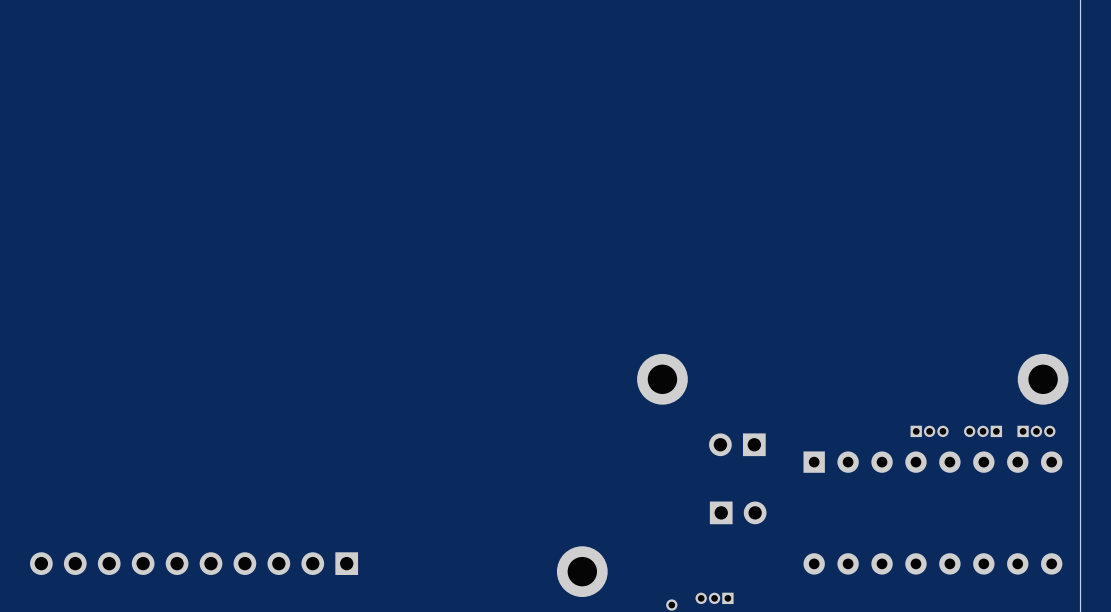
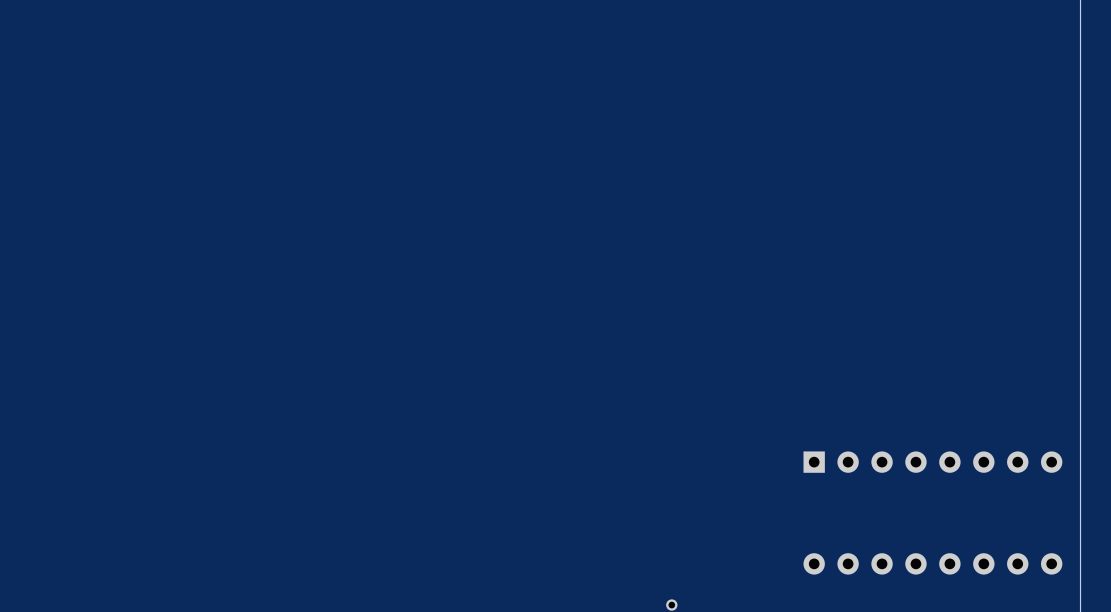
part: (662, 379) -> none
part: (1043, 379) -> none
part: (929, 431) -> none
part: (983, 431) -> none
part: (1036, 431) -> none
part: (737, 444) -> none
part: (738, 512) -> none
part: (194, 563) -> none
part: (582, 571) -> none
part: (714, 598) -> none

